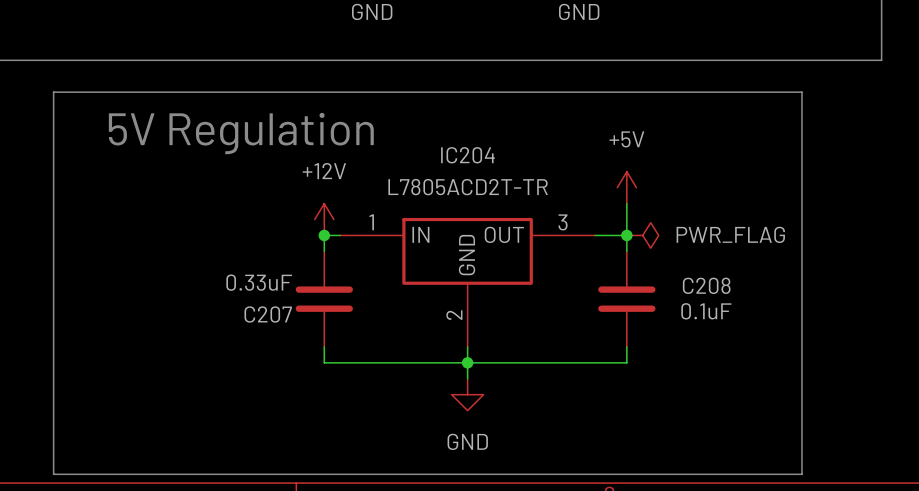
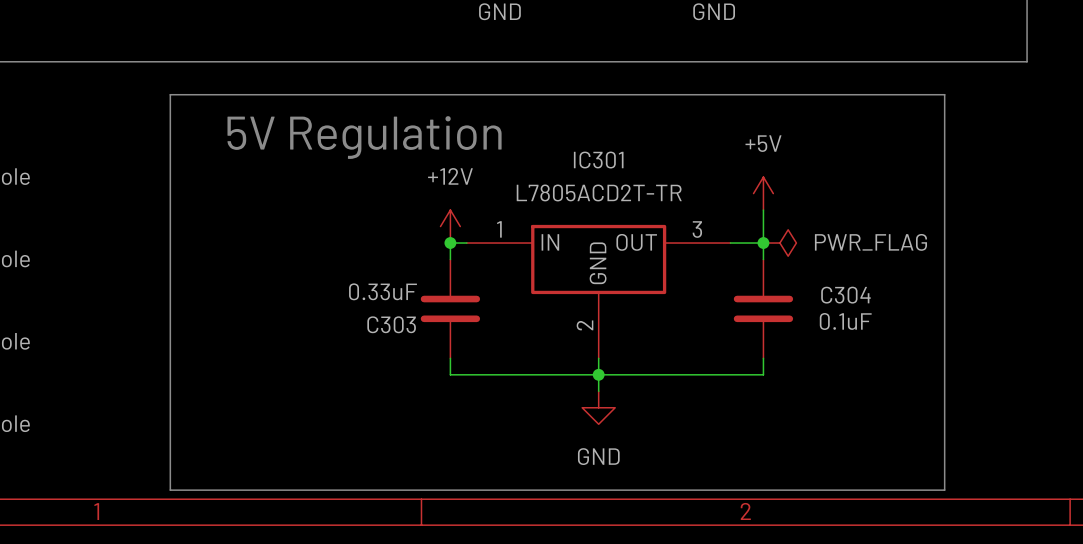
IC204 name: IC204 (467, 155) -> IC301 (598, 160)
C208 name: C208 (706, 285) -> C304 (845, 295)
C207 name: C207 (268, 314) -> C303 (391, 324)

